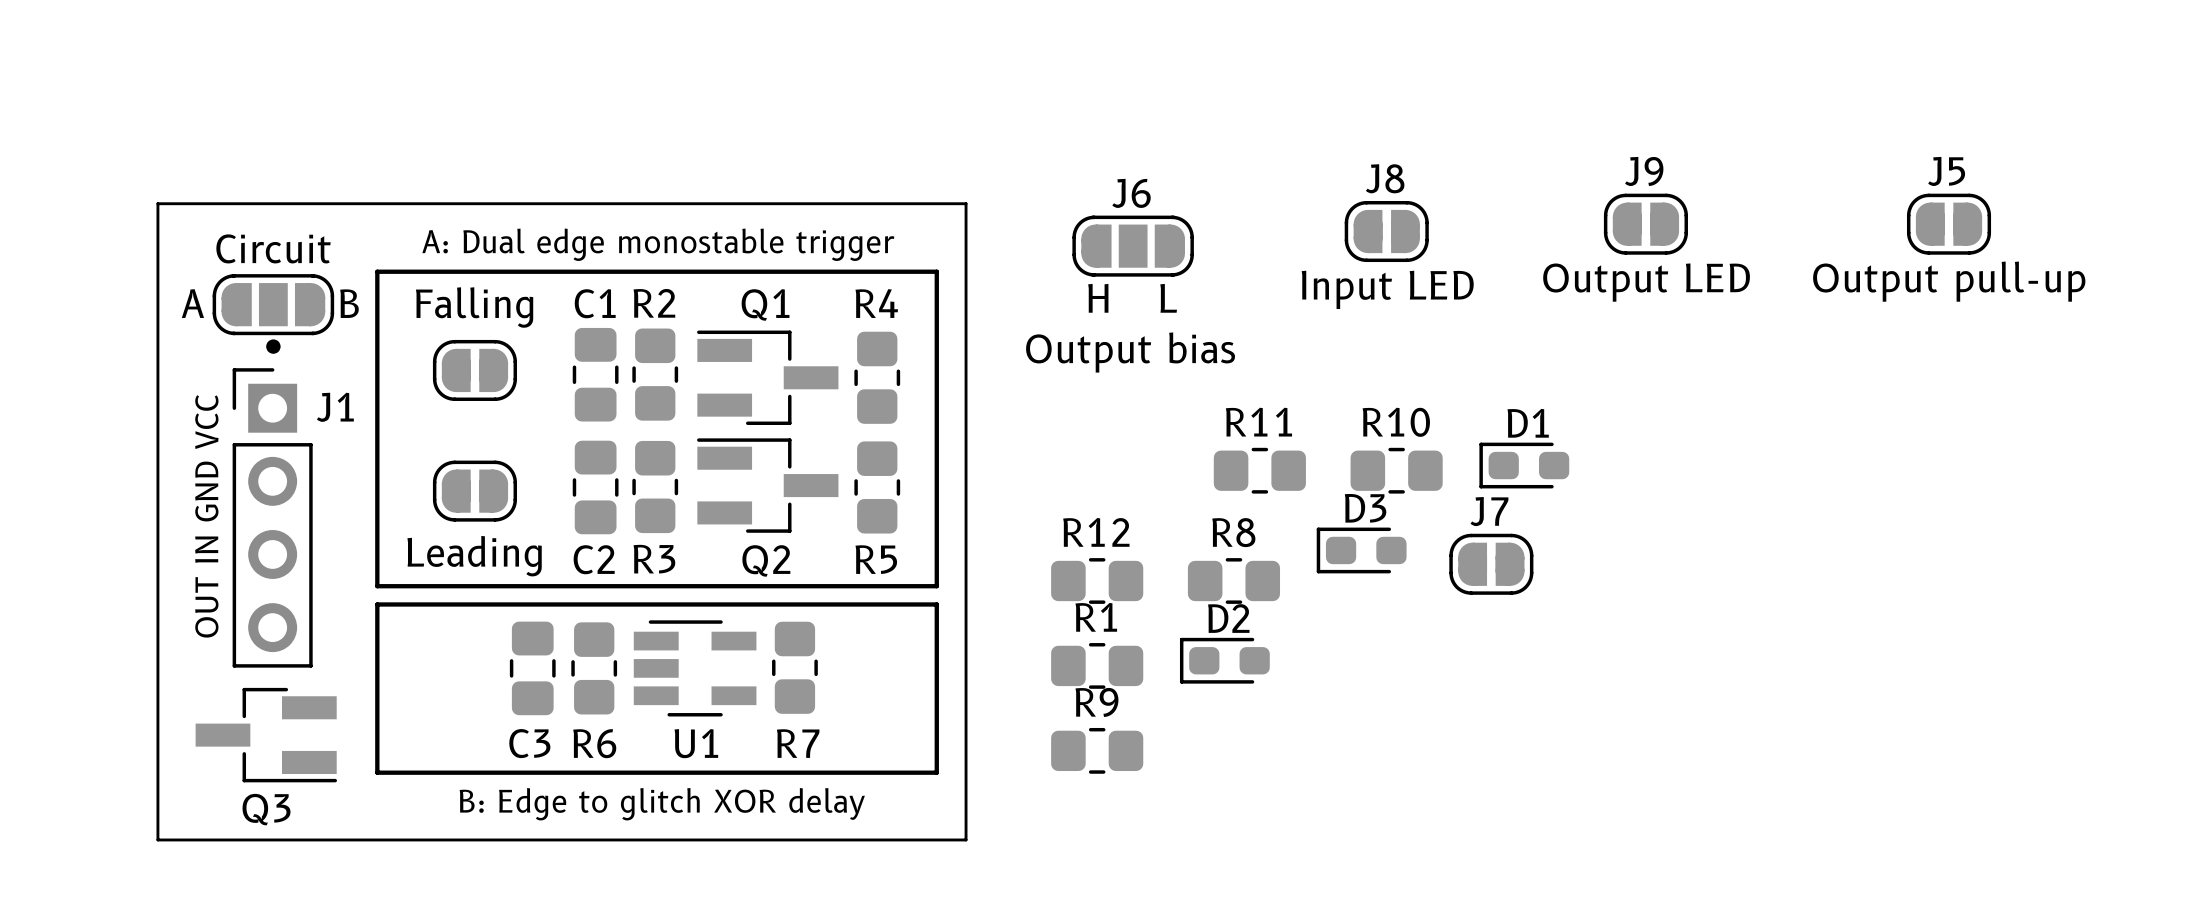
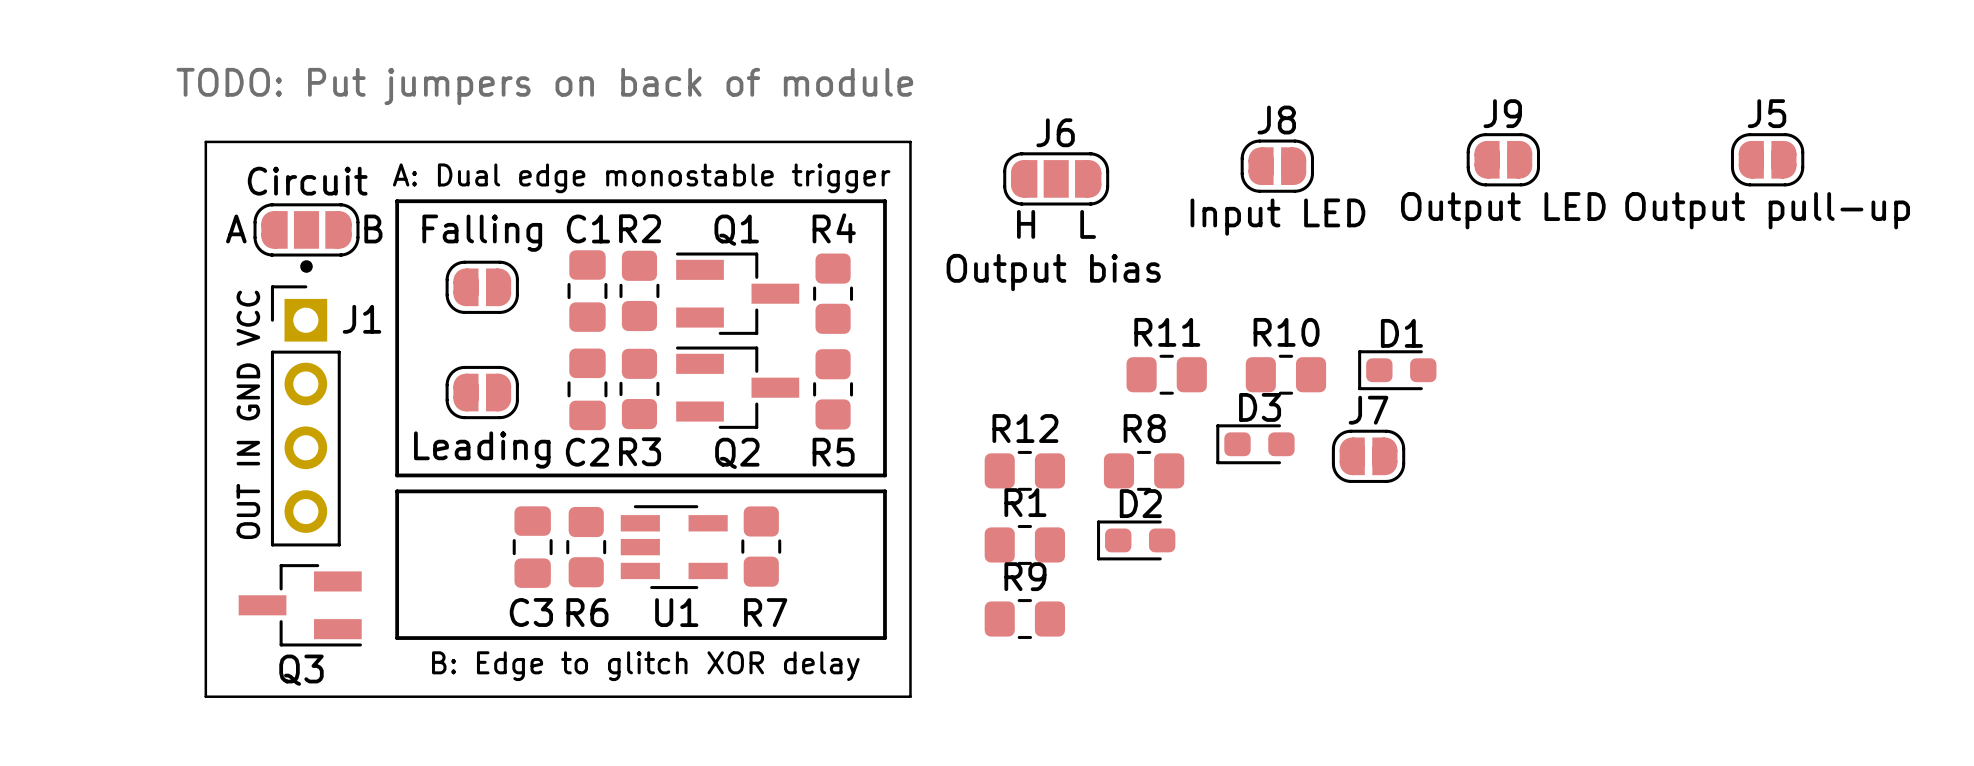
text: none -> TODO: Put jumpers on back of module (544, 86)

